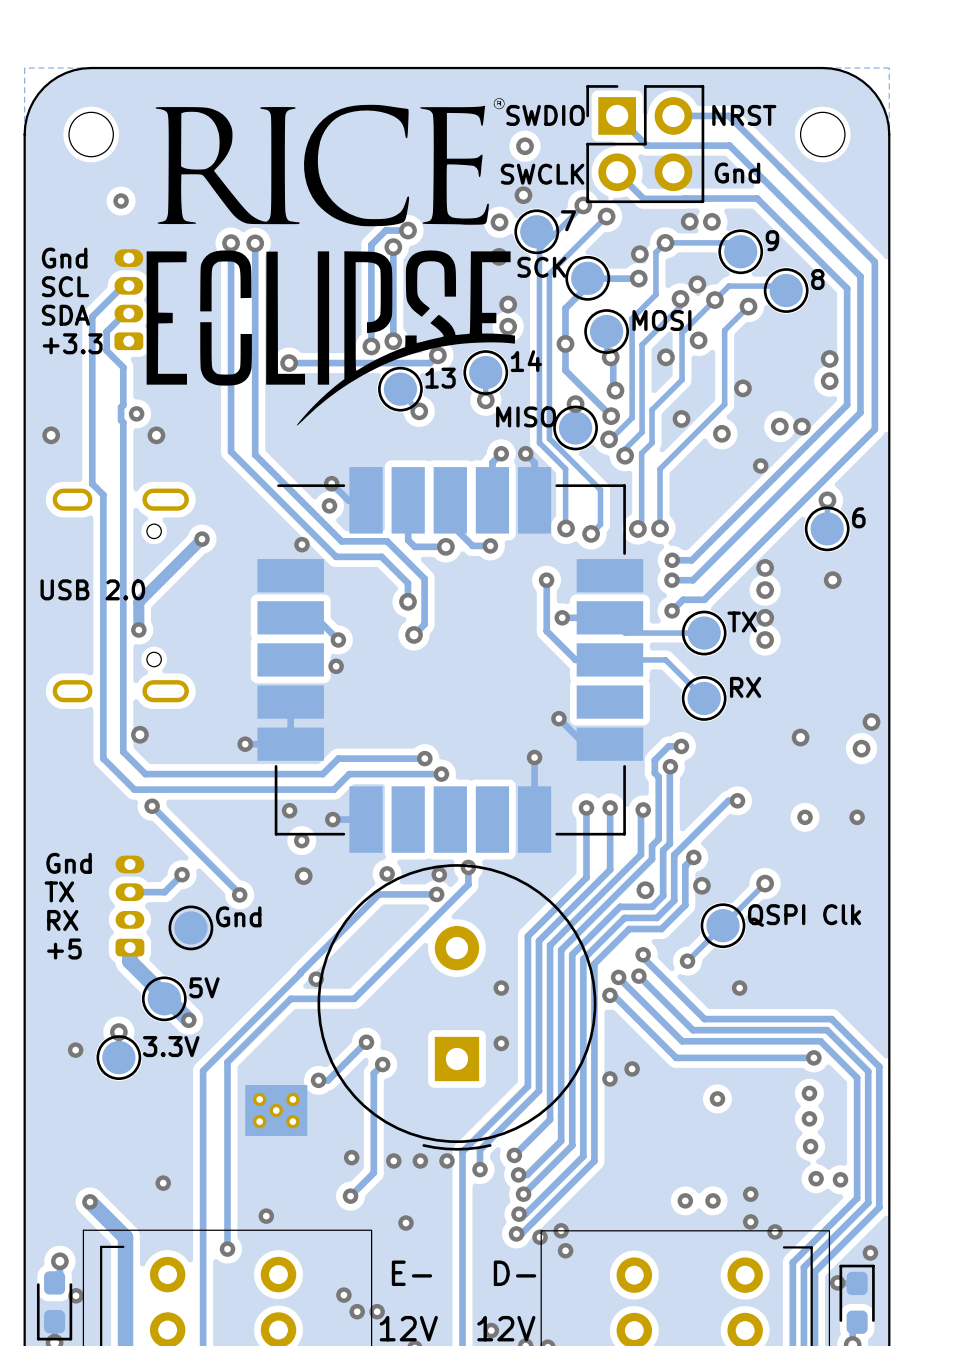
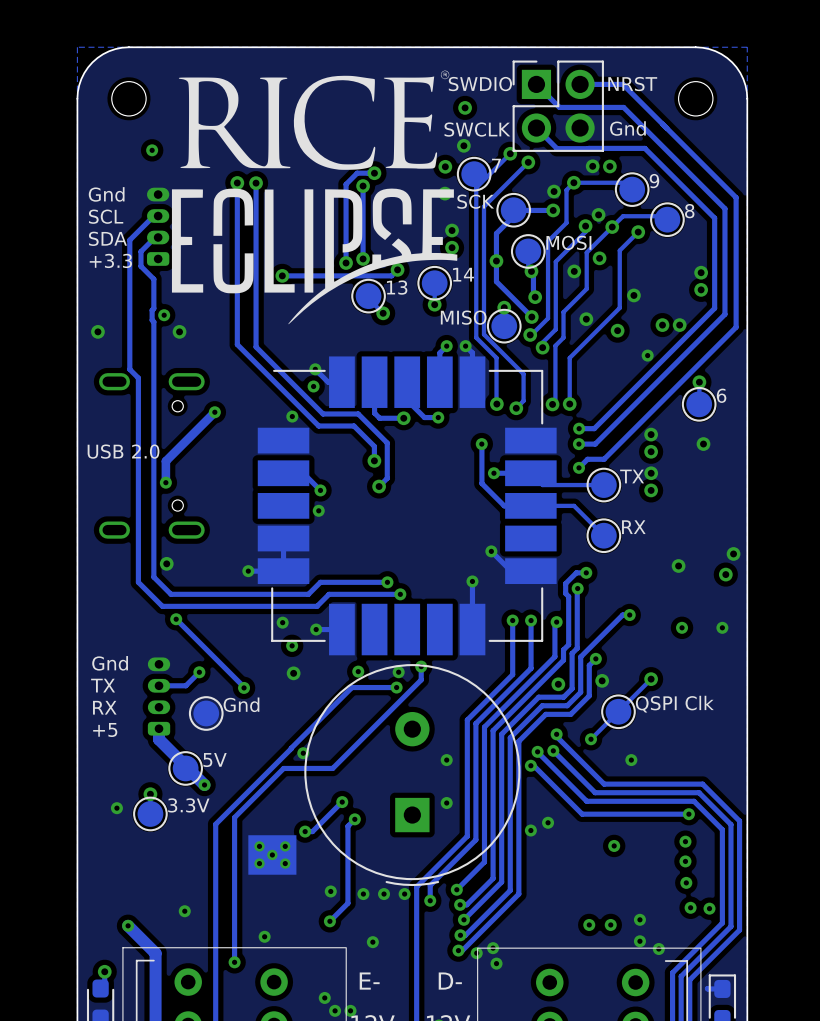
via: (870, 1252) -> none
via: (837, 1282) -> none
via: (76, 1295) -> none

